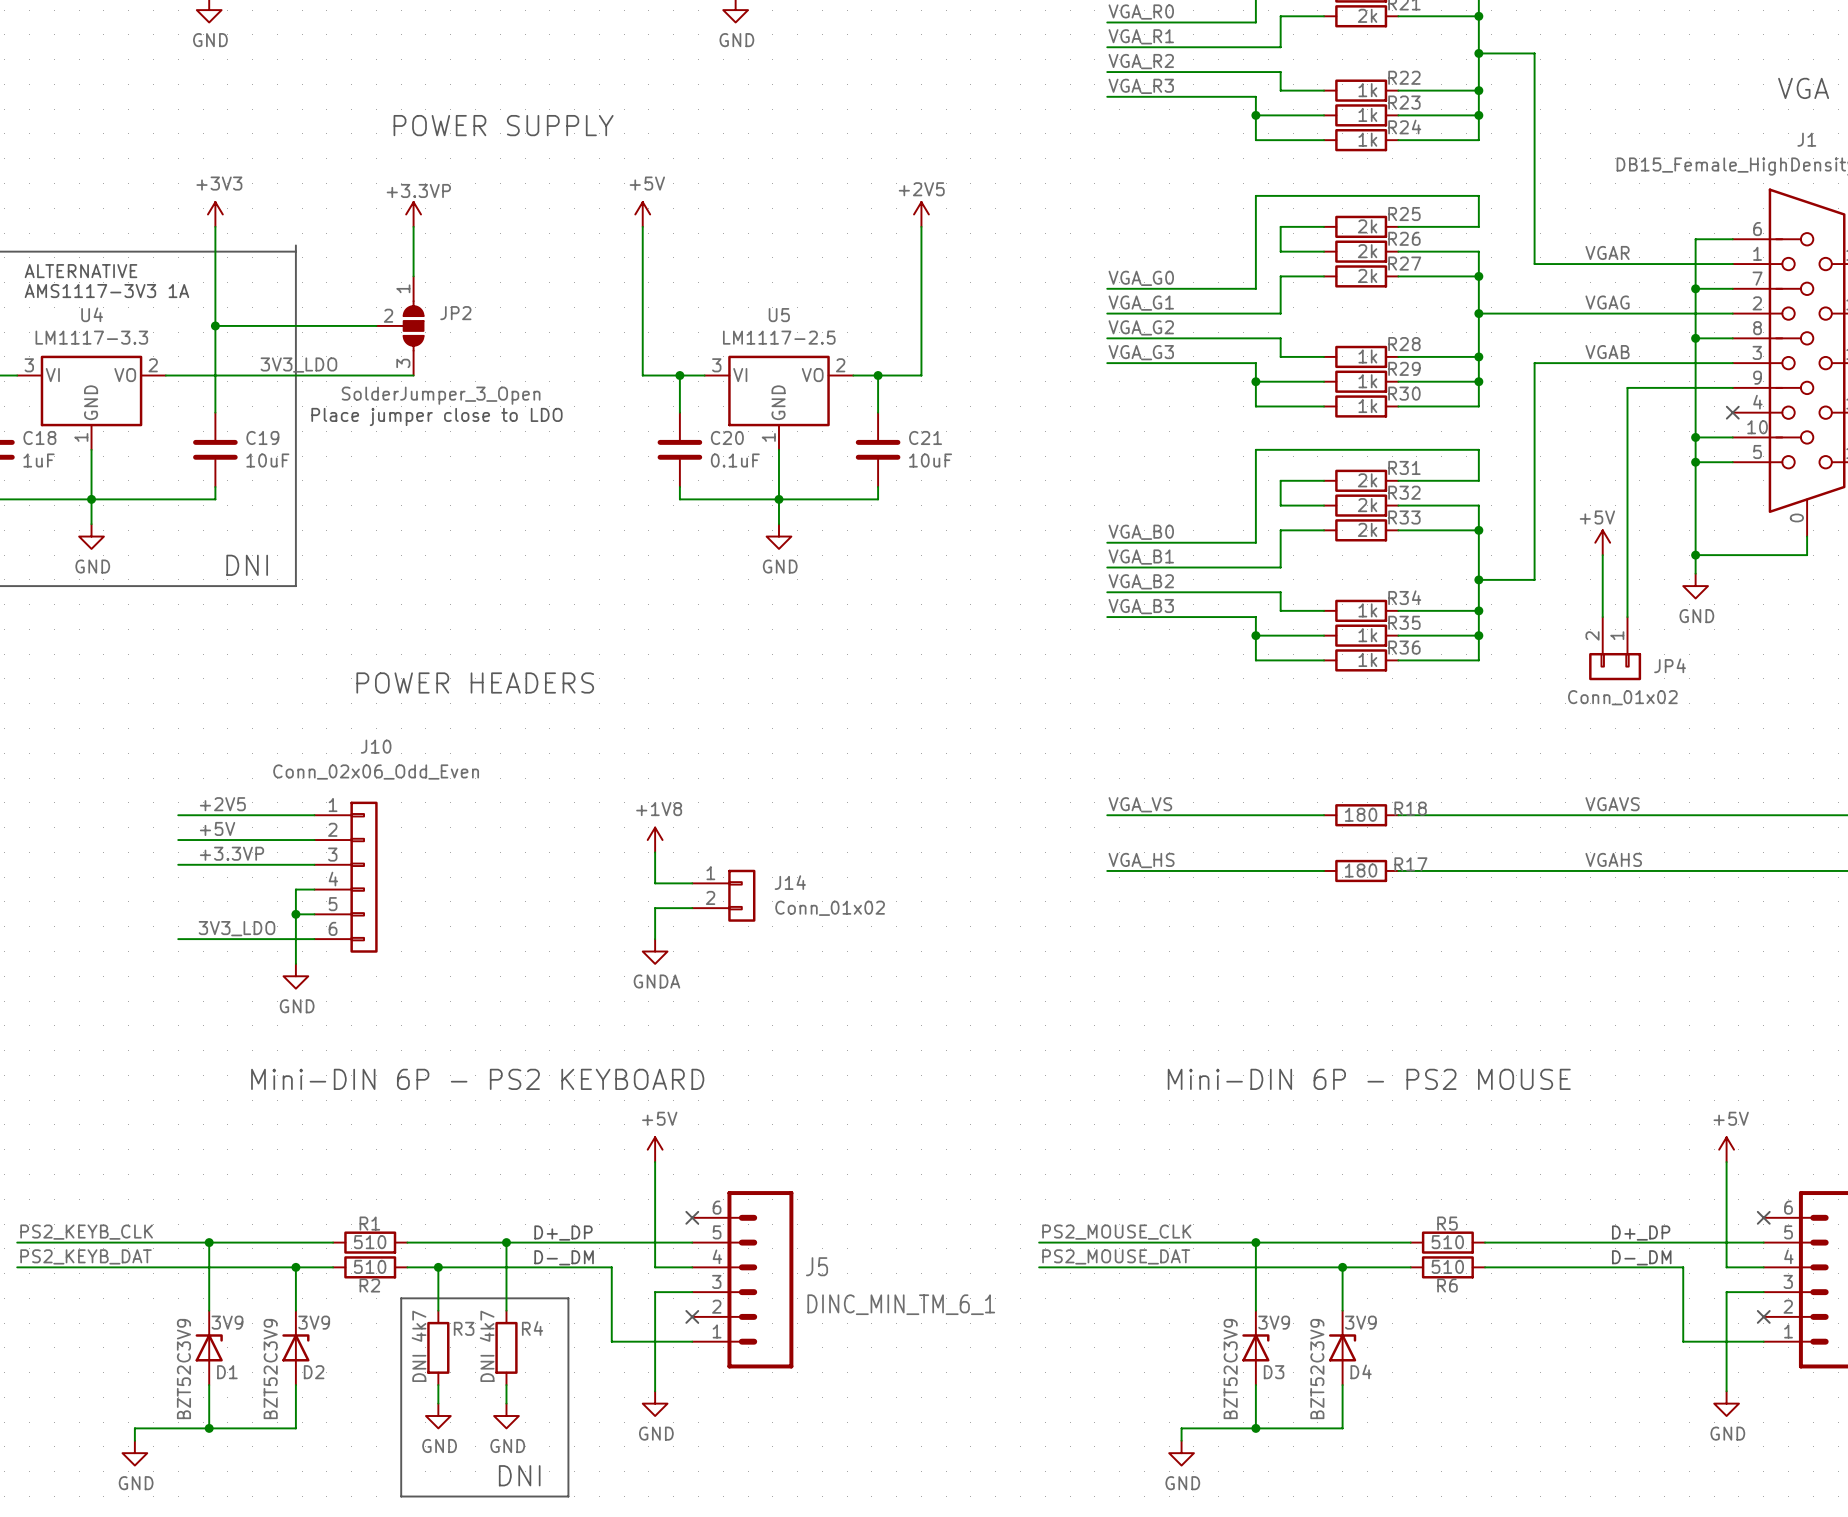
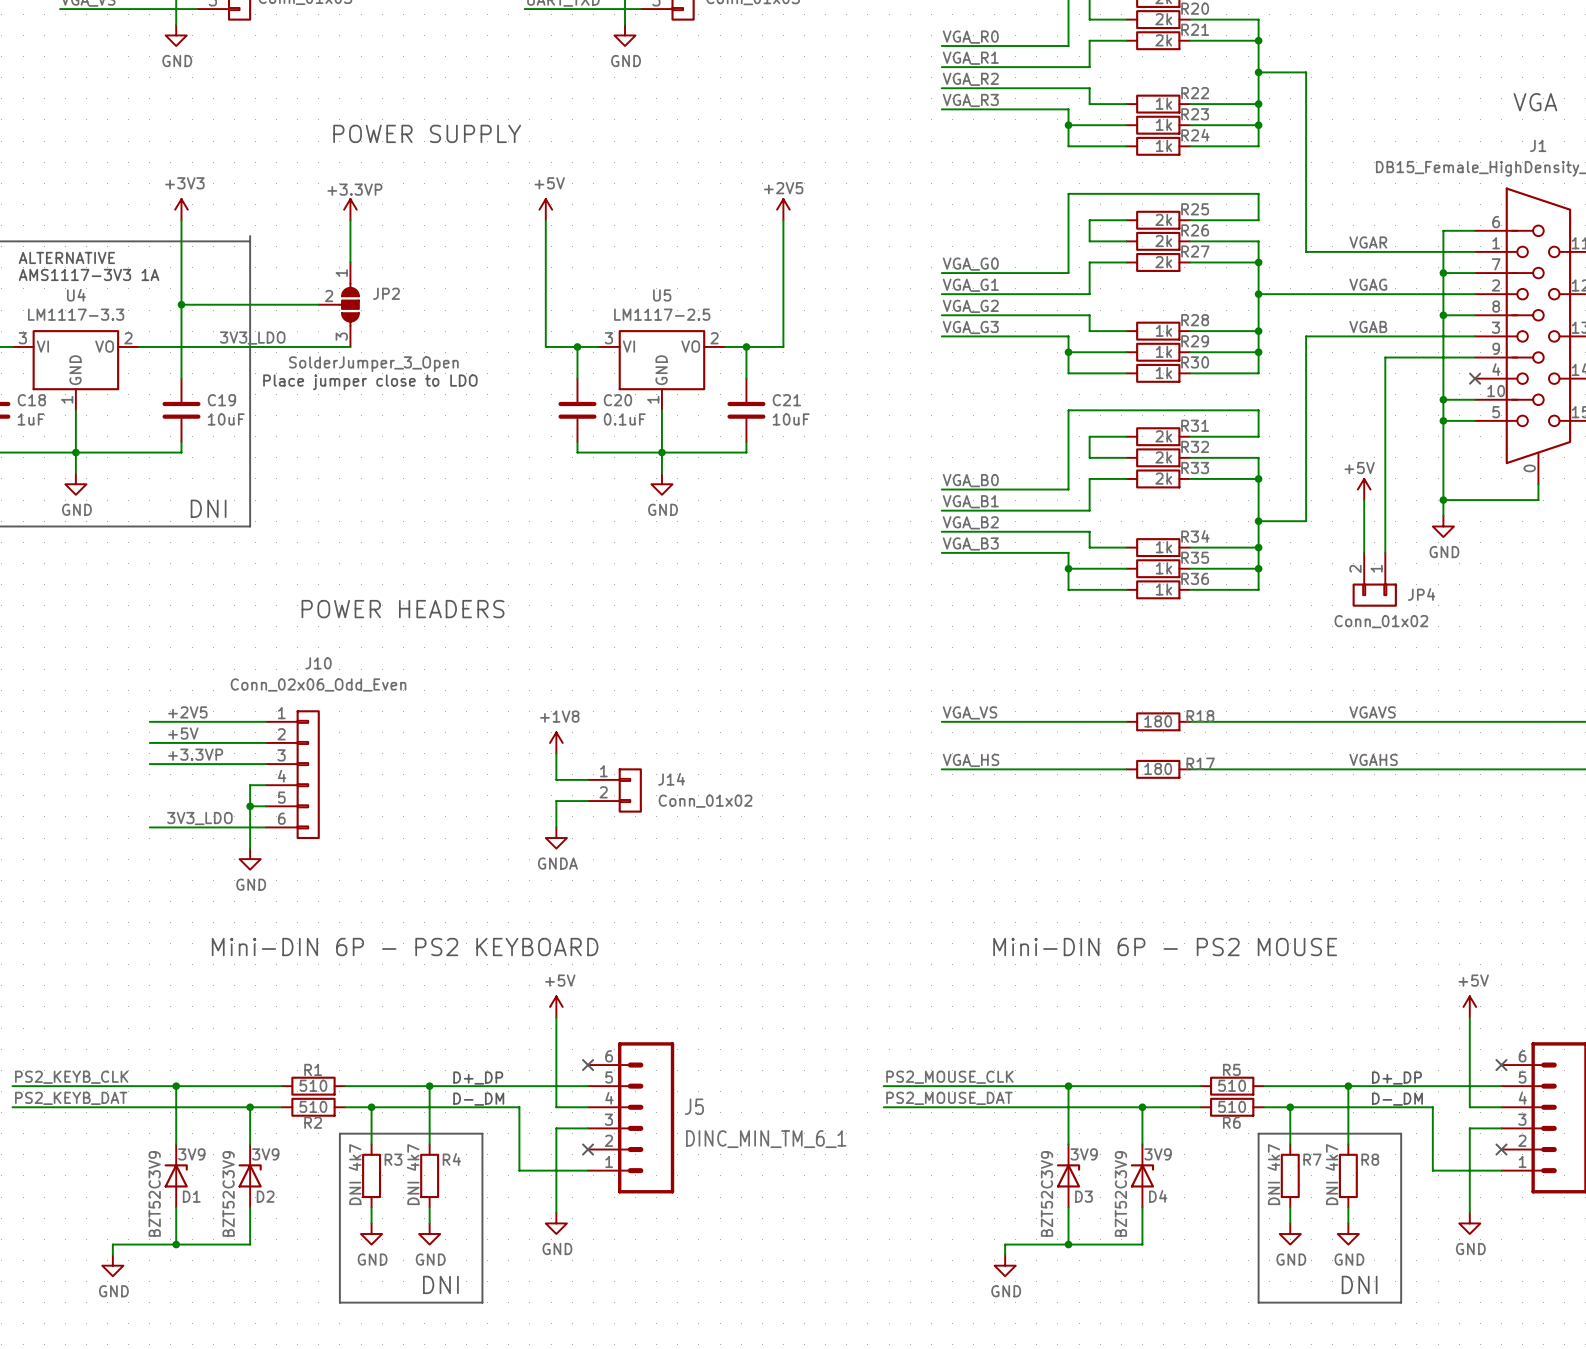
wire: none -> (1348, 1086) (1348, 1144)
junction: none -> (1348, 1086)
wire: none -> (1290, 1107) (1290, 1144)
junction: none -> (1290, 1107)
line: none -> (1258, 1133) (1258, 1302) (1401, 1302) (1401, 1133) (1258, 1133)
R7: none -> DNI 4k7 (1290, 1175)
R8: none -> DNI 4k7 (1348, 1175)
wire: none -> (1290, 1207) (1290, 1223)
wire: none -> (1348, 1207) (1348, 1223)
power symbol: none -> GND (1290, 1233)
power symbol: none -> GND (1348, 1233)
text: none -> DNI (1359, 1284)

